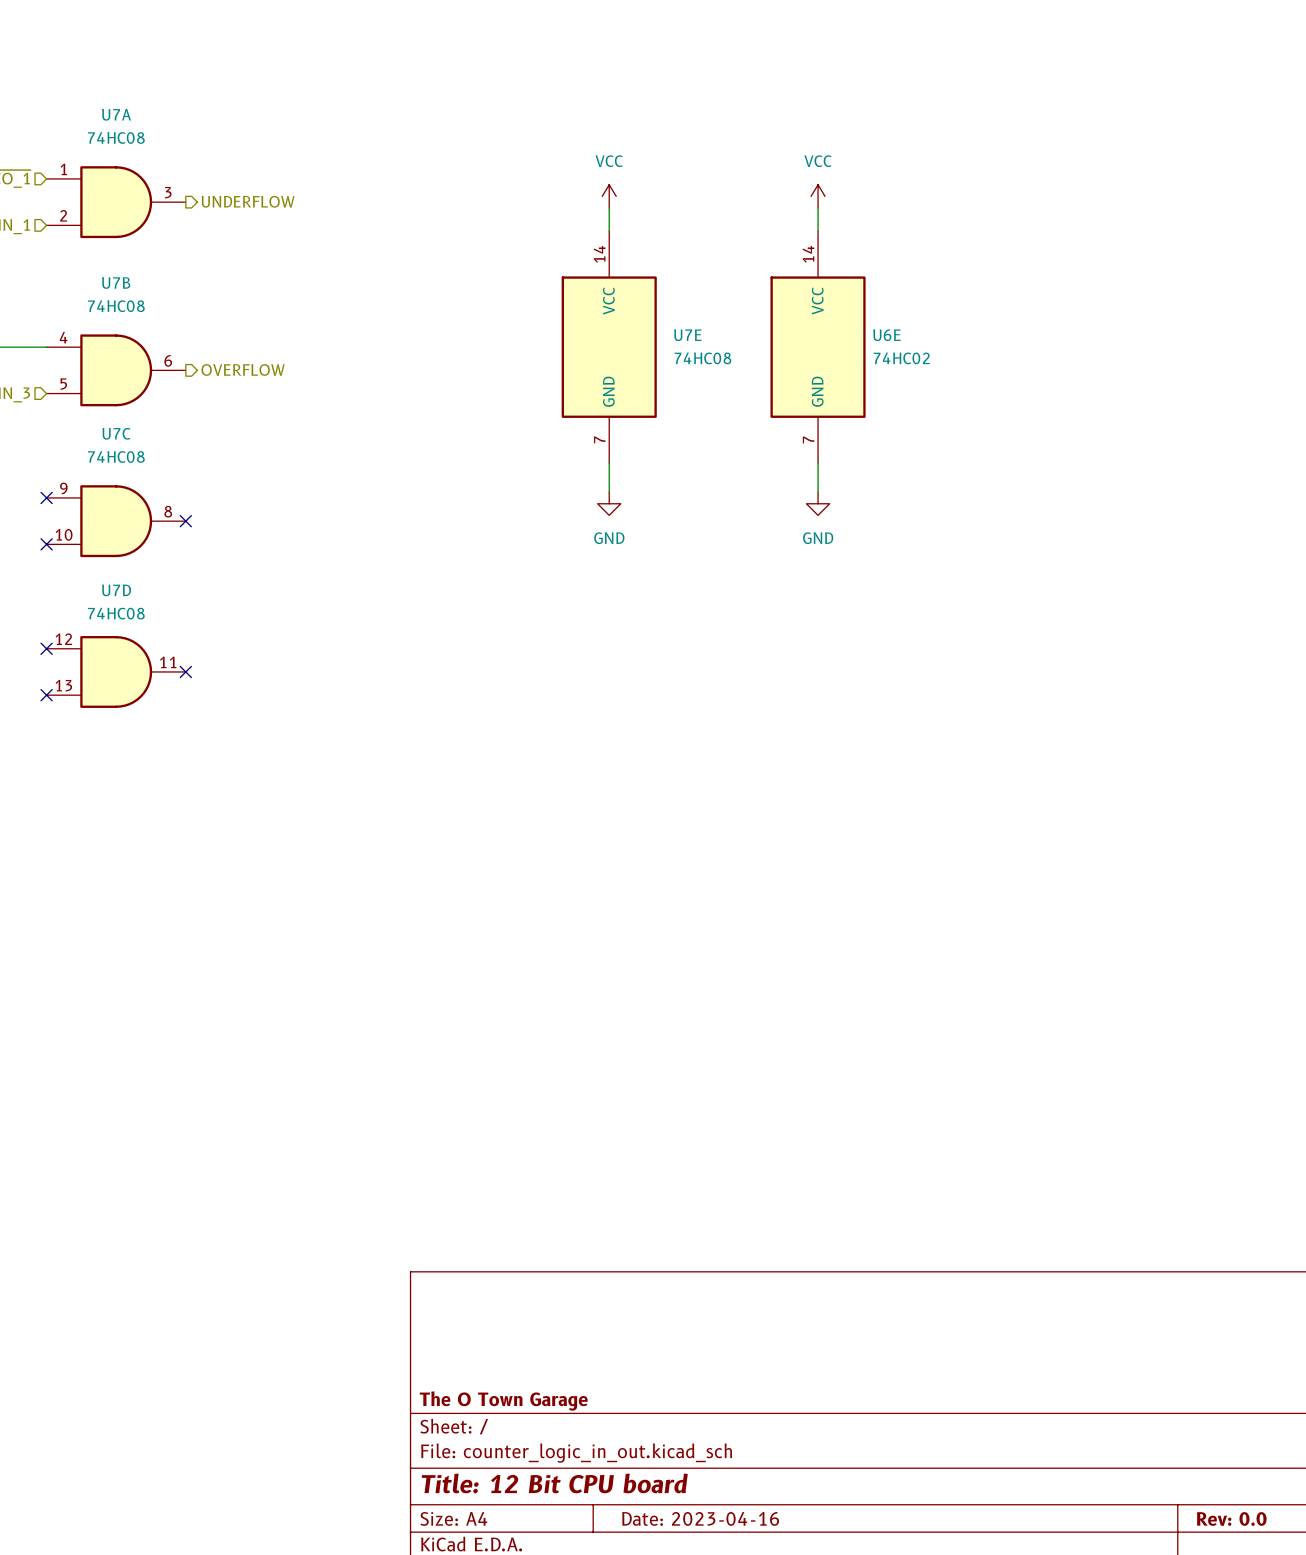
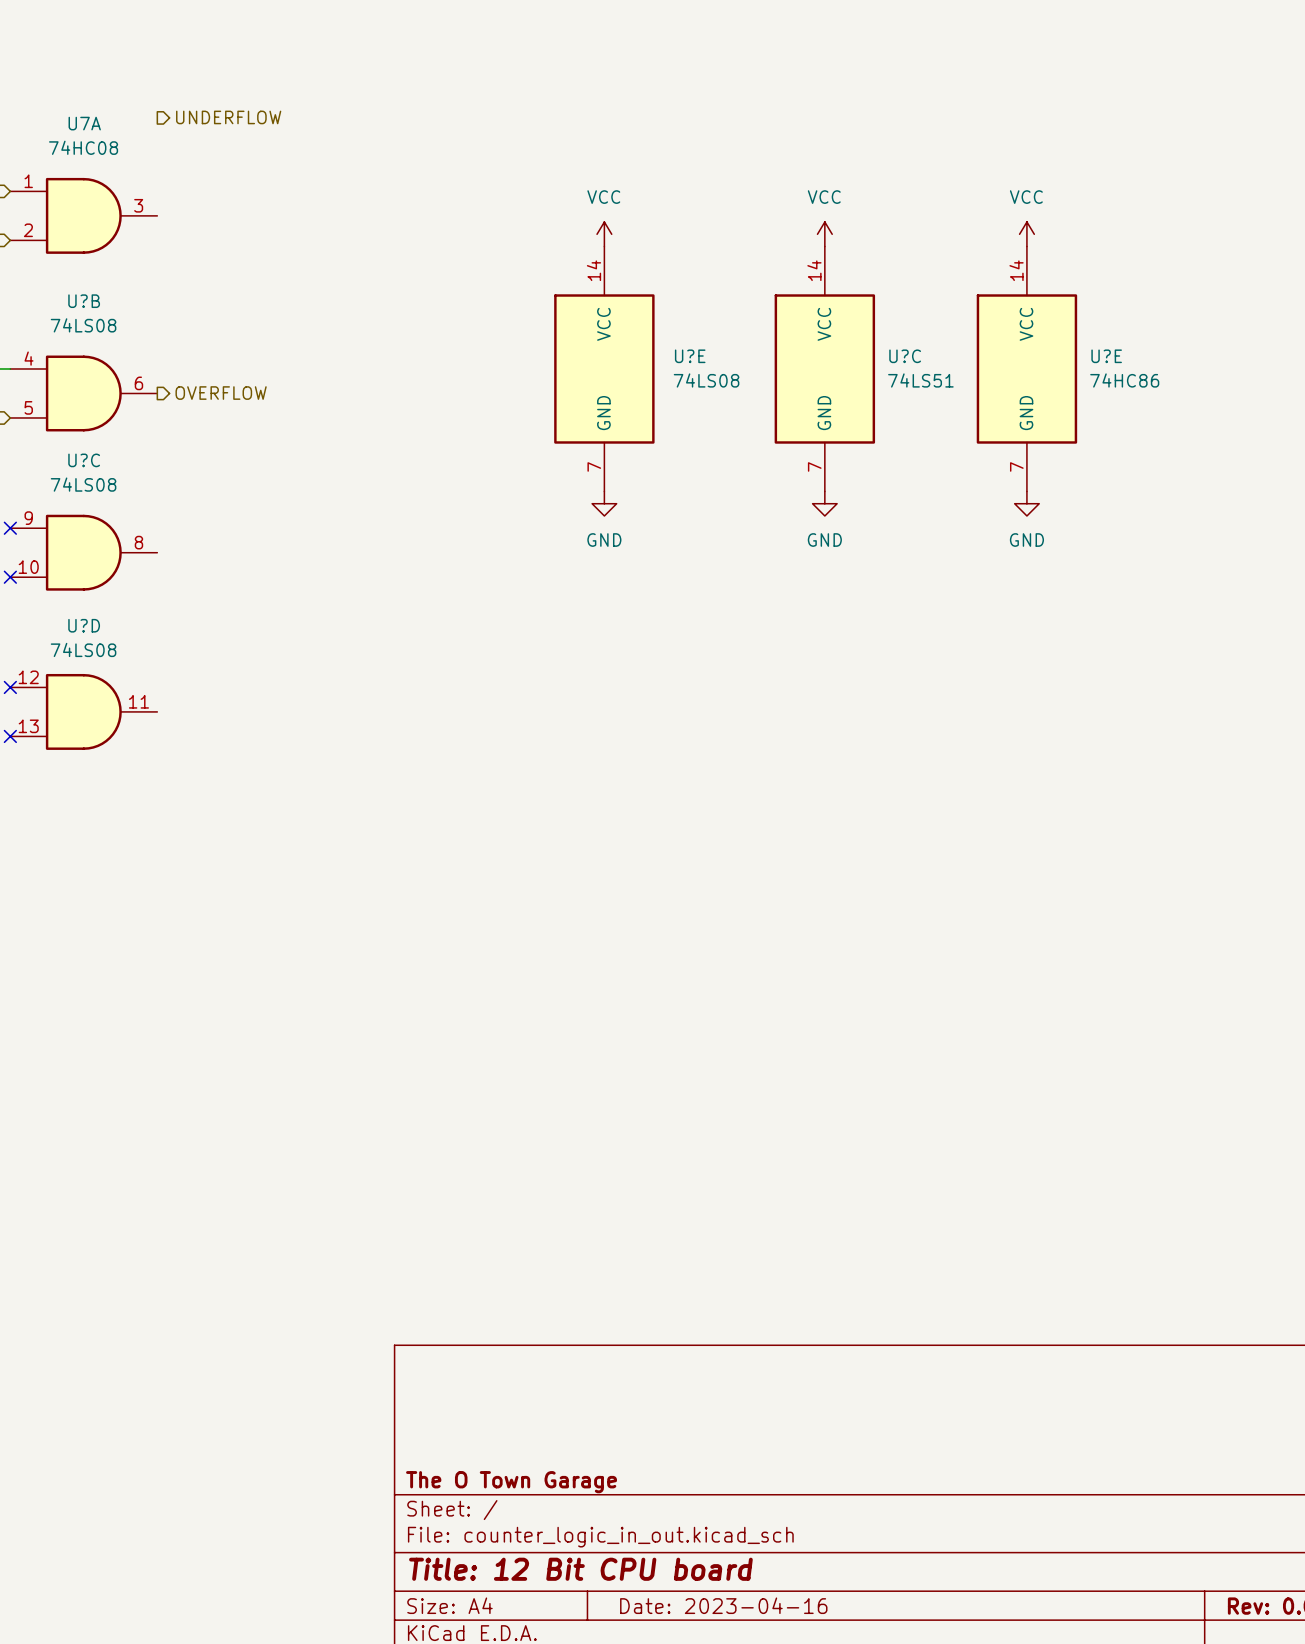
power symbol position: VCC (609, 196) -> VCC (604, 234)
power symbol position: VCC (818, 196) -> VCC (824, 234)
hierarchical label position: UNDERFLOW (248, 201) -> UNDERFLOW (228, 117)
power symbol: none -> VCC (1026, 234)
U7B name: U7B (116, 282) -> U?B (84, 301)
U7B value: 74HC08 (116, 306) -> 74LS08 (83, 325)
U7E name: U7E (687, 335) -> U?E (690, 356)
U6E name: U6E (886, 335) -> U?C (905, 356)
U?E: none -> 74HC86 (1026, 368)
U7E value: 74HC08 (702, 358) -> 74LS08 (706, 380)
U6E value: 74HC02 (901, 358) -> 74LS51 (920, 380)
U7C name: U7C (116, 433) -> U?C (84, 460)
U7C value: 74HC08 (116, 456) -> 74LS08 (83, 484)
wire: (609, 463) (609, 492) -> none
wire: (818, 463) (818, 492) -> none
power symbol: none -> GND (1026, 503)
power symbol position: GND (609, 503) -> GND (604, 503)
power symbol position: GND (818, 503) -> GND (824, 503)
no-connect mark: (185, 521) -> none
U7D name: U7D (116, 590) -> U?D (84, 625)
U7D value: 74HC08 (116, 613) -> 74LS08 (83, 649)
no-connect mark: (185, 671) -> none

